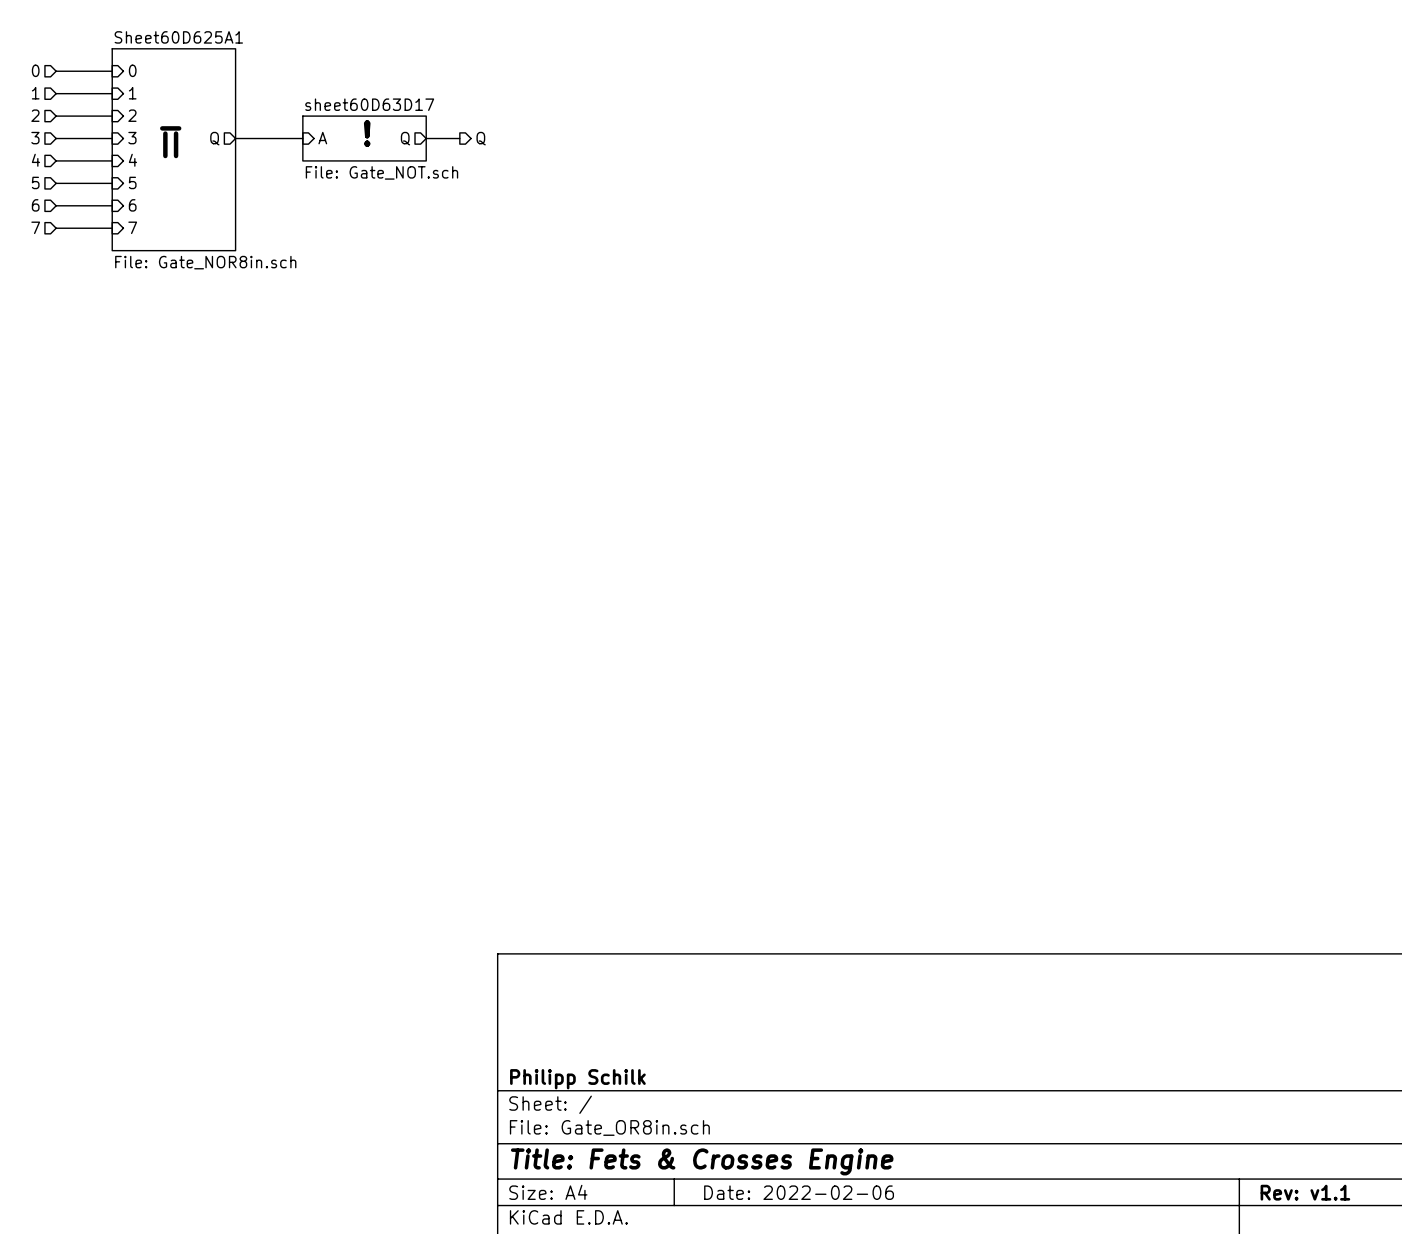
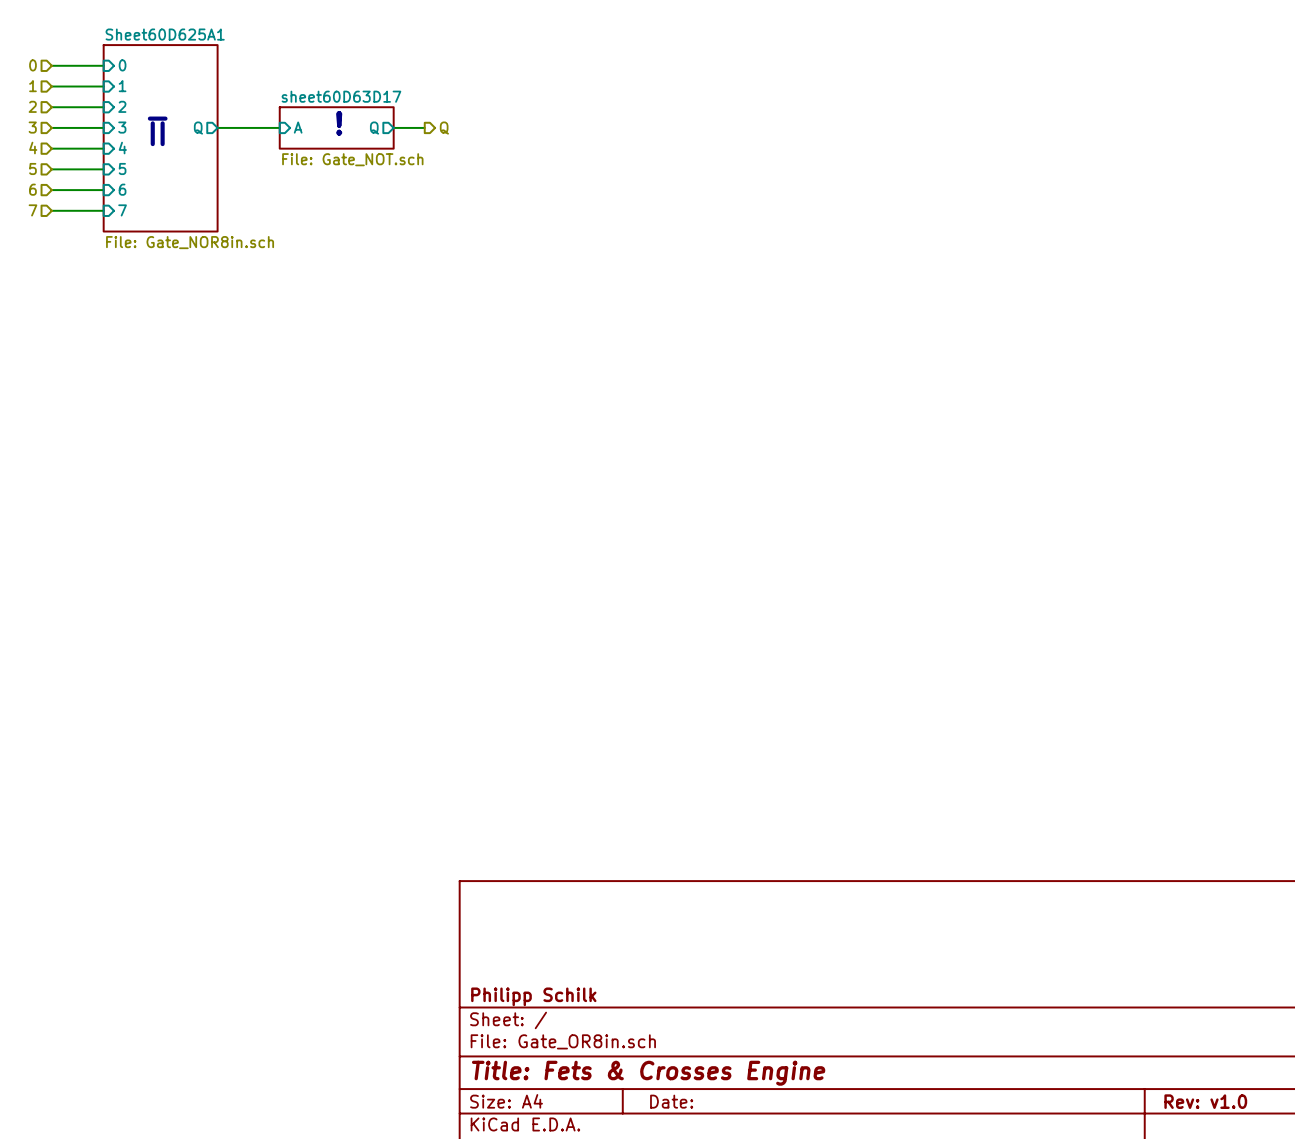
title block: Date: 2022-02-06 (799, 1192) -> Date: (671, 1101)
title block: Rev: v1.1 (1305, 1192) -> Rev: v1.0 (1205, 1101)

